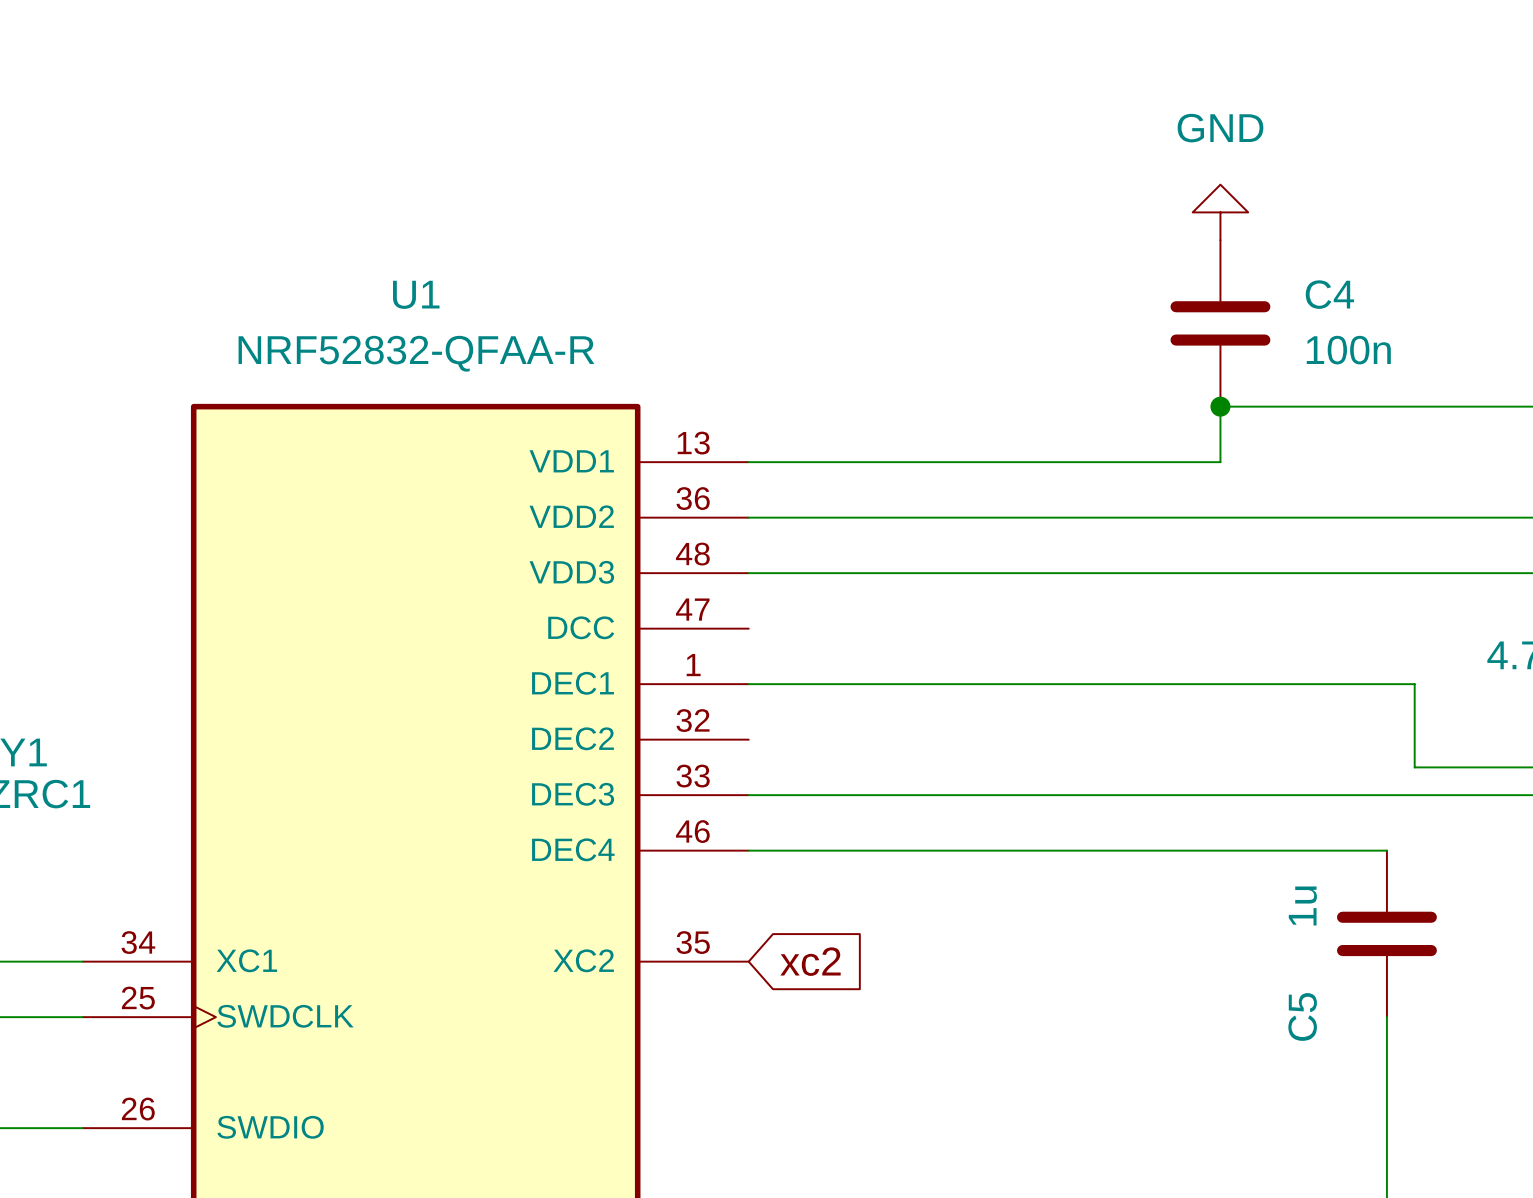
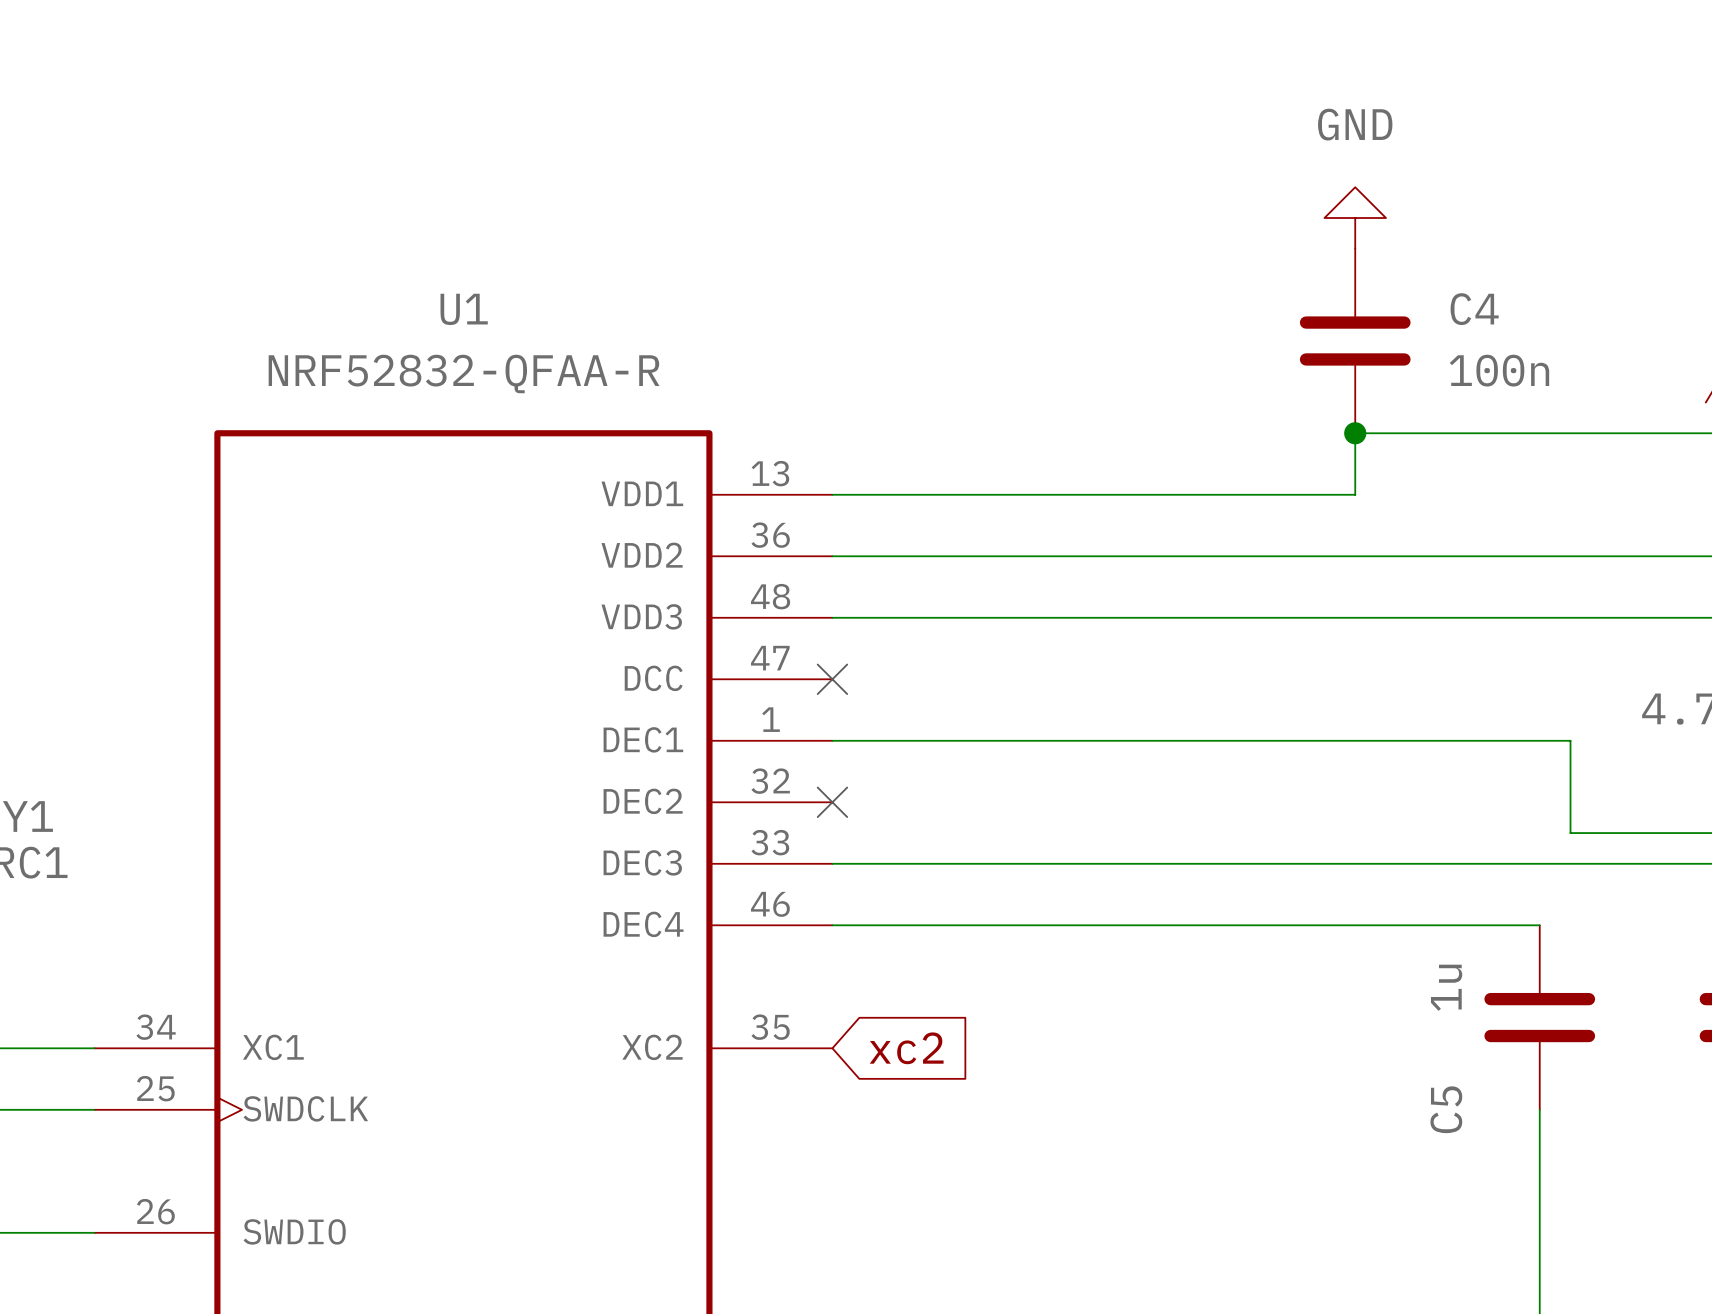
no-connect mark: none -> (832, 679)
no-connect mark: none -> (832, 802)

